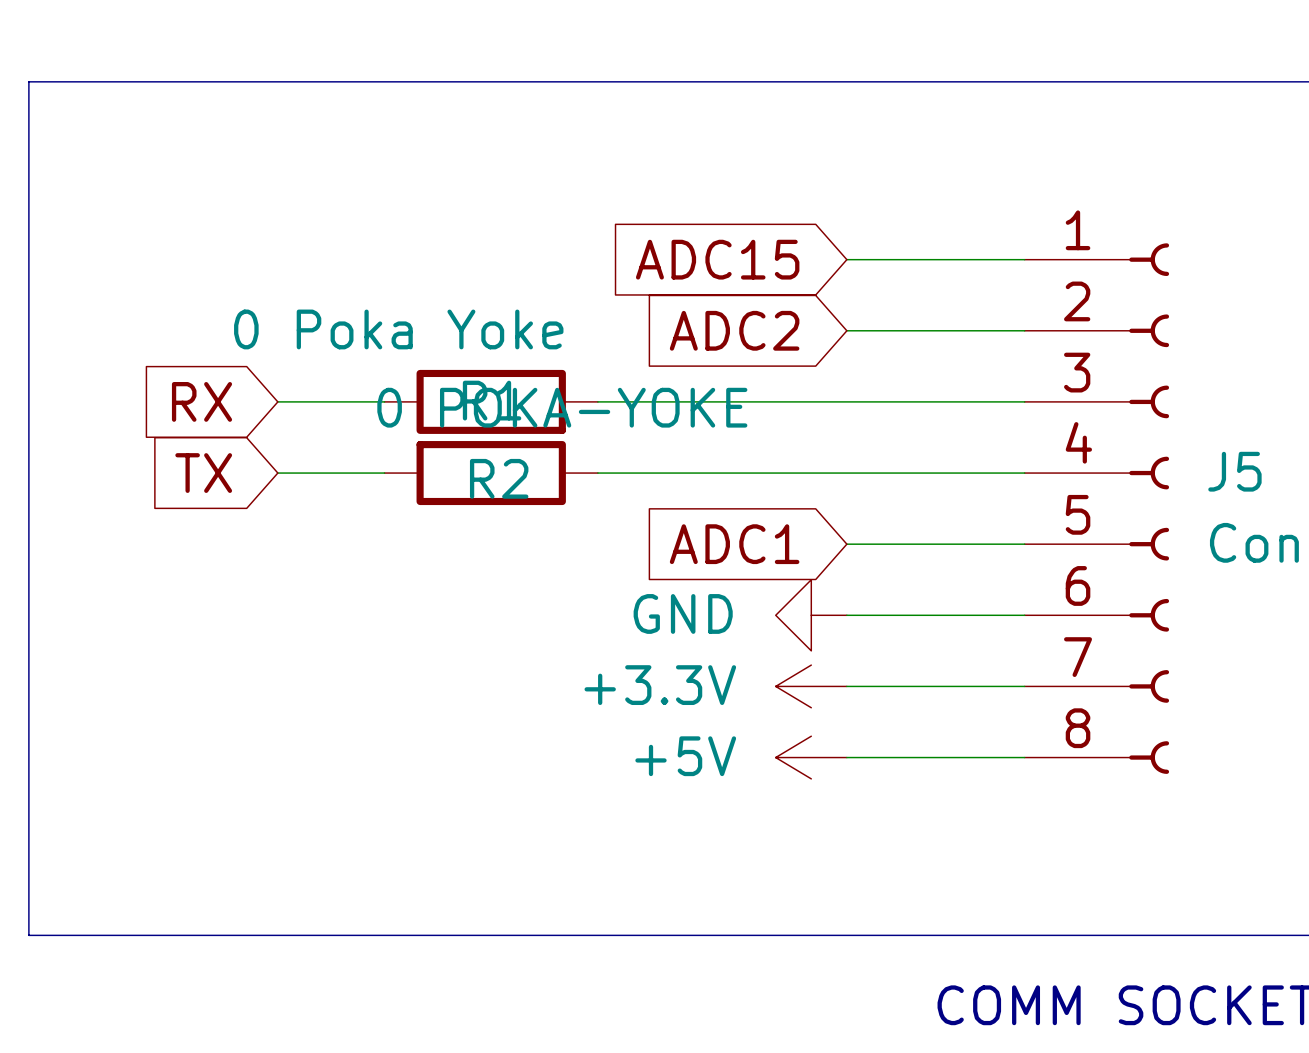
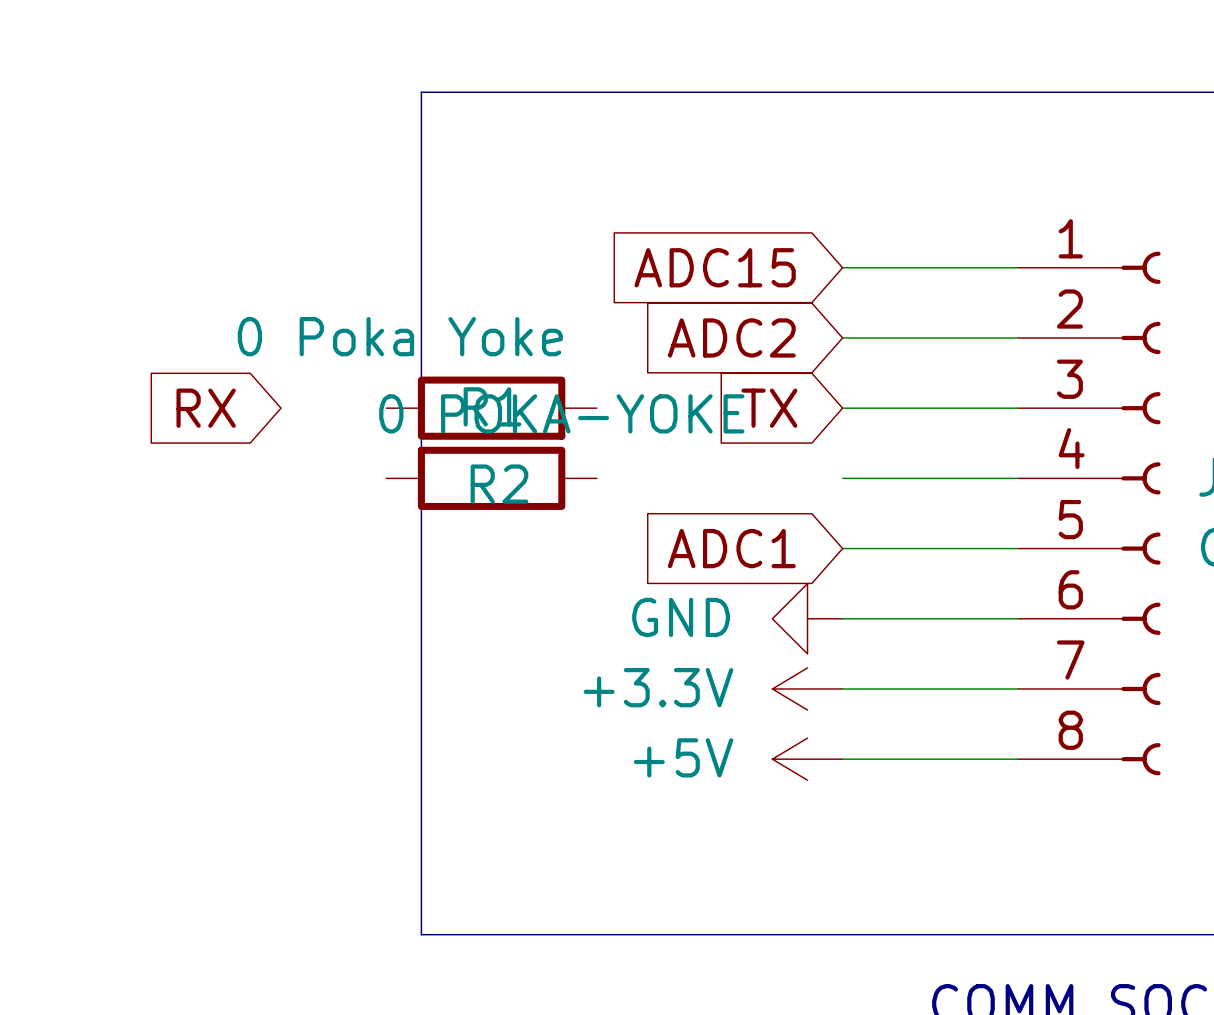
line: (420, 81) (28, 81) (28, 935) (420, 935) -> (421, 92) (421, 934)
wire: (277, 401) (384, 401) -> none
wire: (597, 401) (846, 401) -> none
global label position: TX (203, 473) -> TX (769, 408)
wire: (277, 473) (384, 473) -> none
wire: (597, 473) (846, 473) -> none

